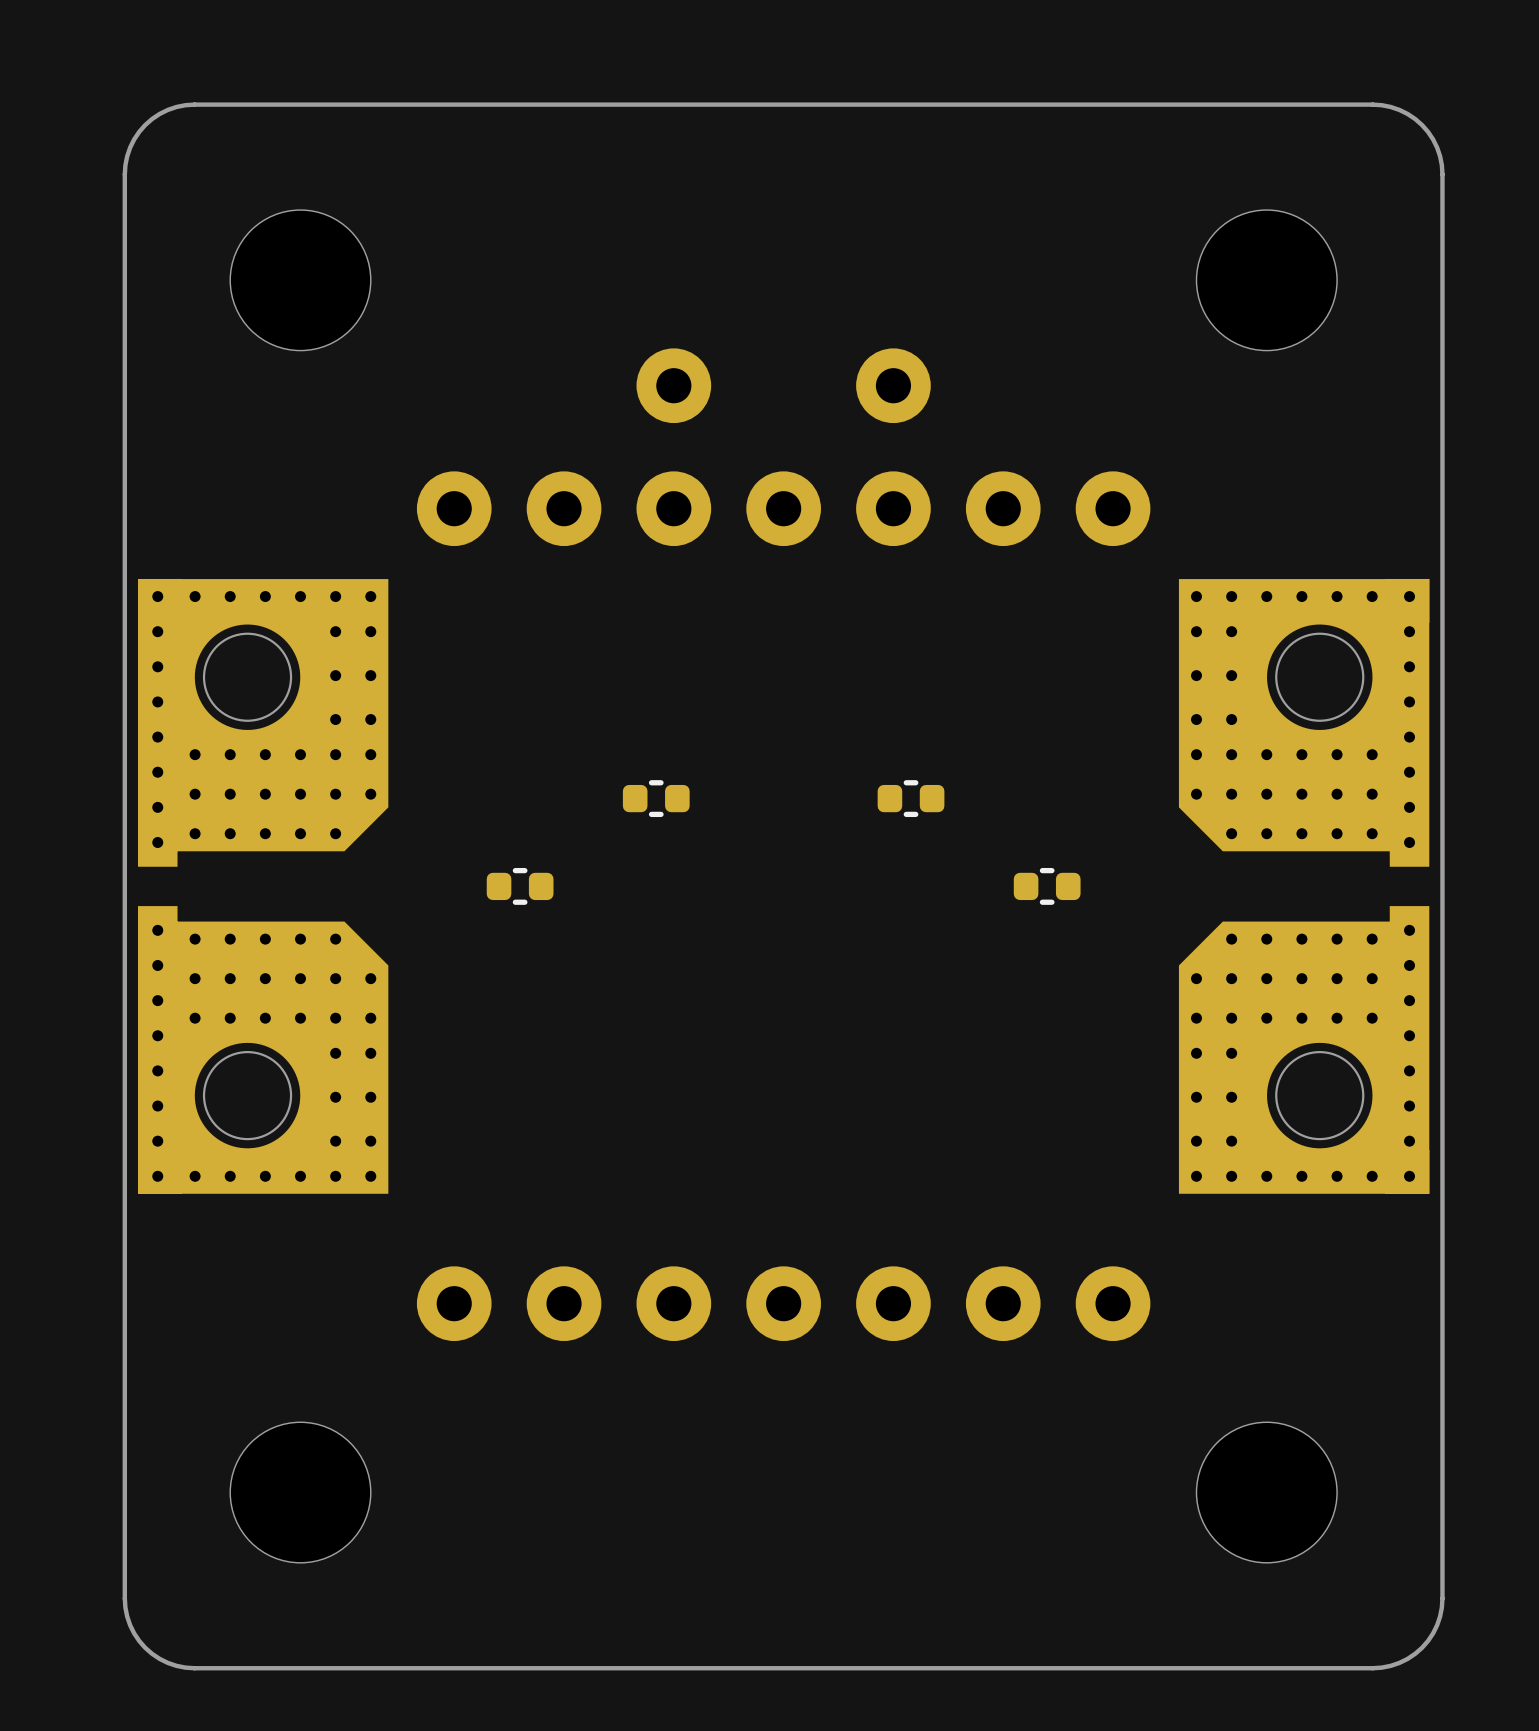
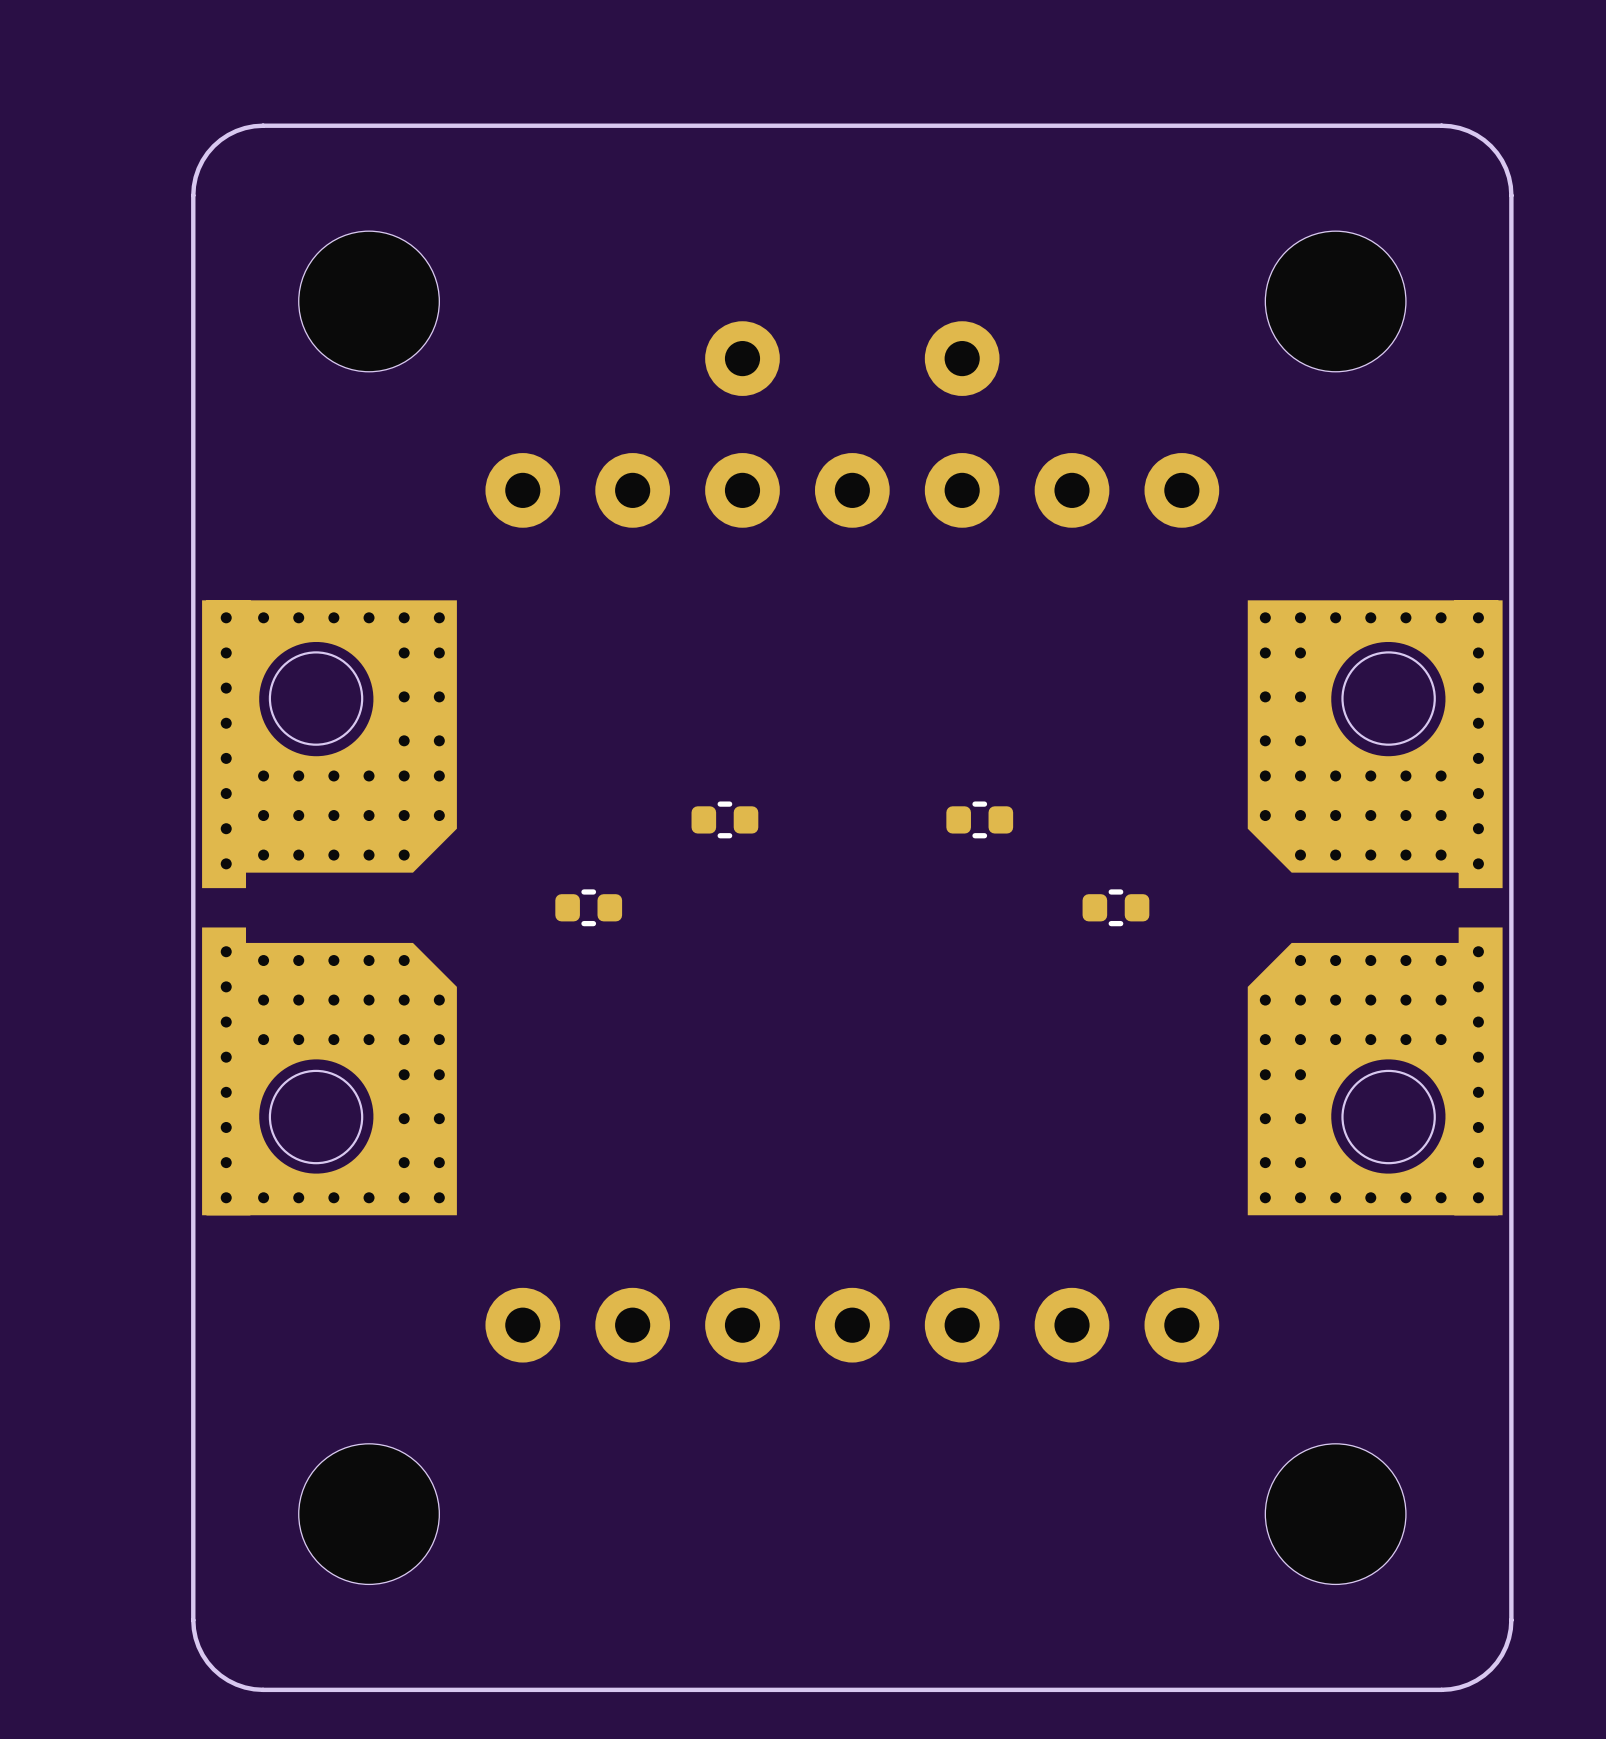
part position: (673, 385) -> (742, 358)
part position: (893, 385) -> (962, 358)
part position: (454, 508) -> (522, 490)
part position: (564, 508) -> (632, 490)
part position: (673, 508) -> (742, 490)
part position: (783, 508) -> (852, 490)
part position: (893, 508) -> (962, 490)
part position: (1003, 508) -> (1072, 490)
part position: (1113, 508) -> (1181, 490)
part footprint: [137, 578, 389, 1194] -> [202, 600, 457, 1216]
part footprint: [1178, 578, 1430, 1194] -> [1247, 600, 1503, 1216]

